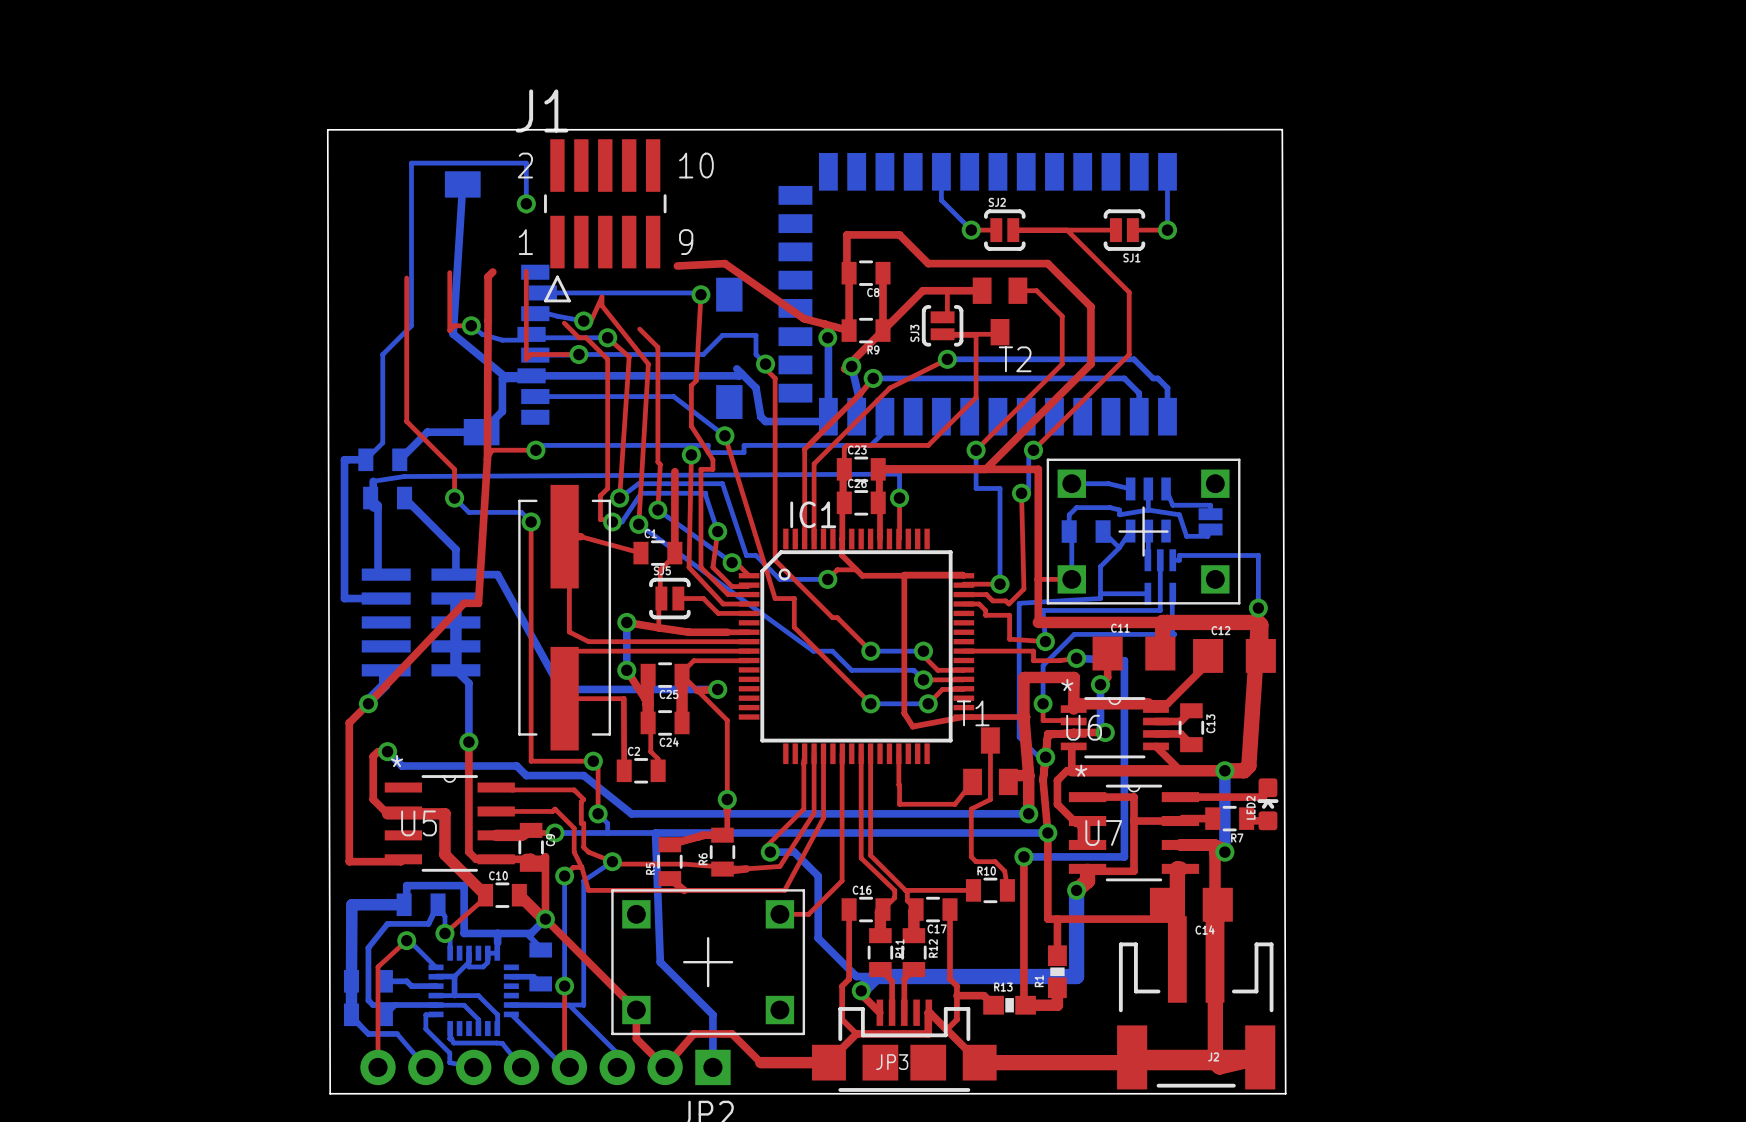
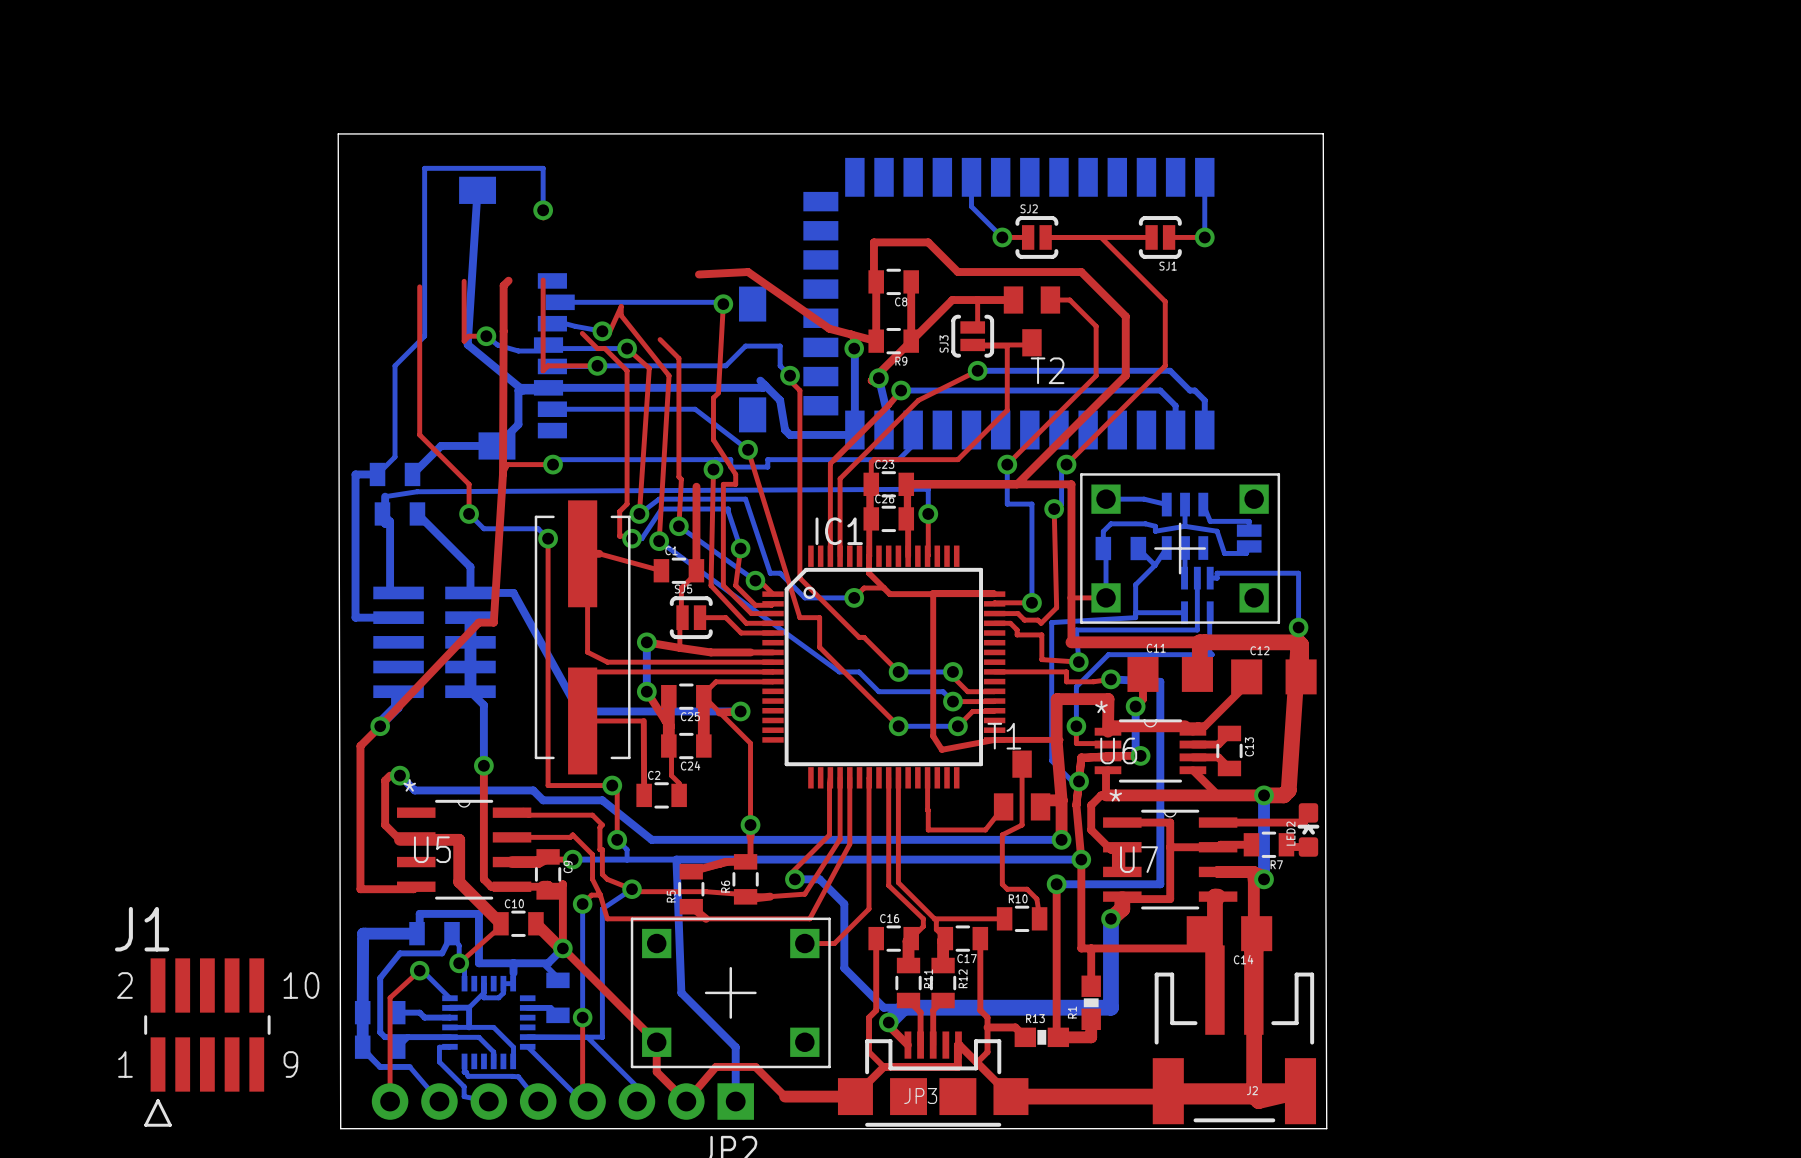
J1 position: (605, 220) -> (207, 1042)

